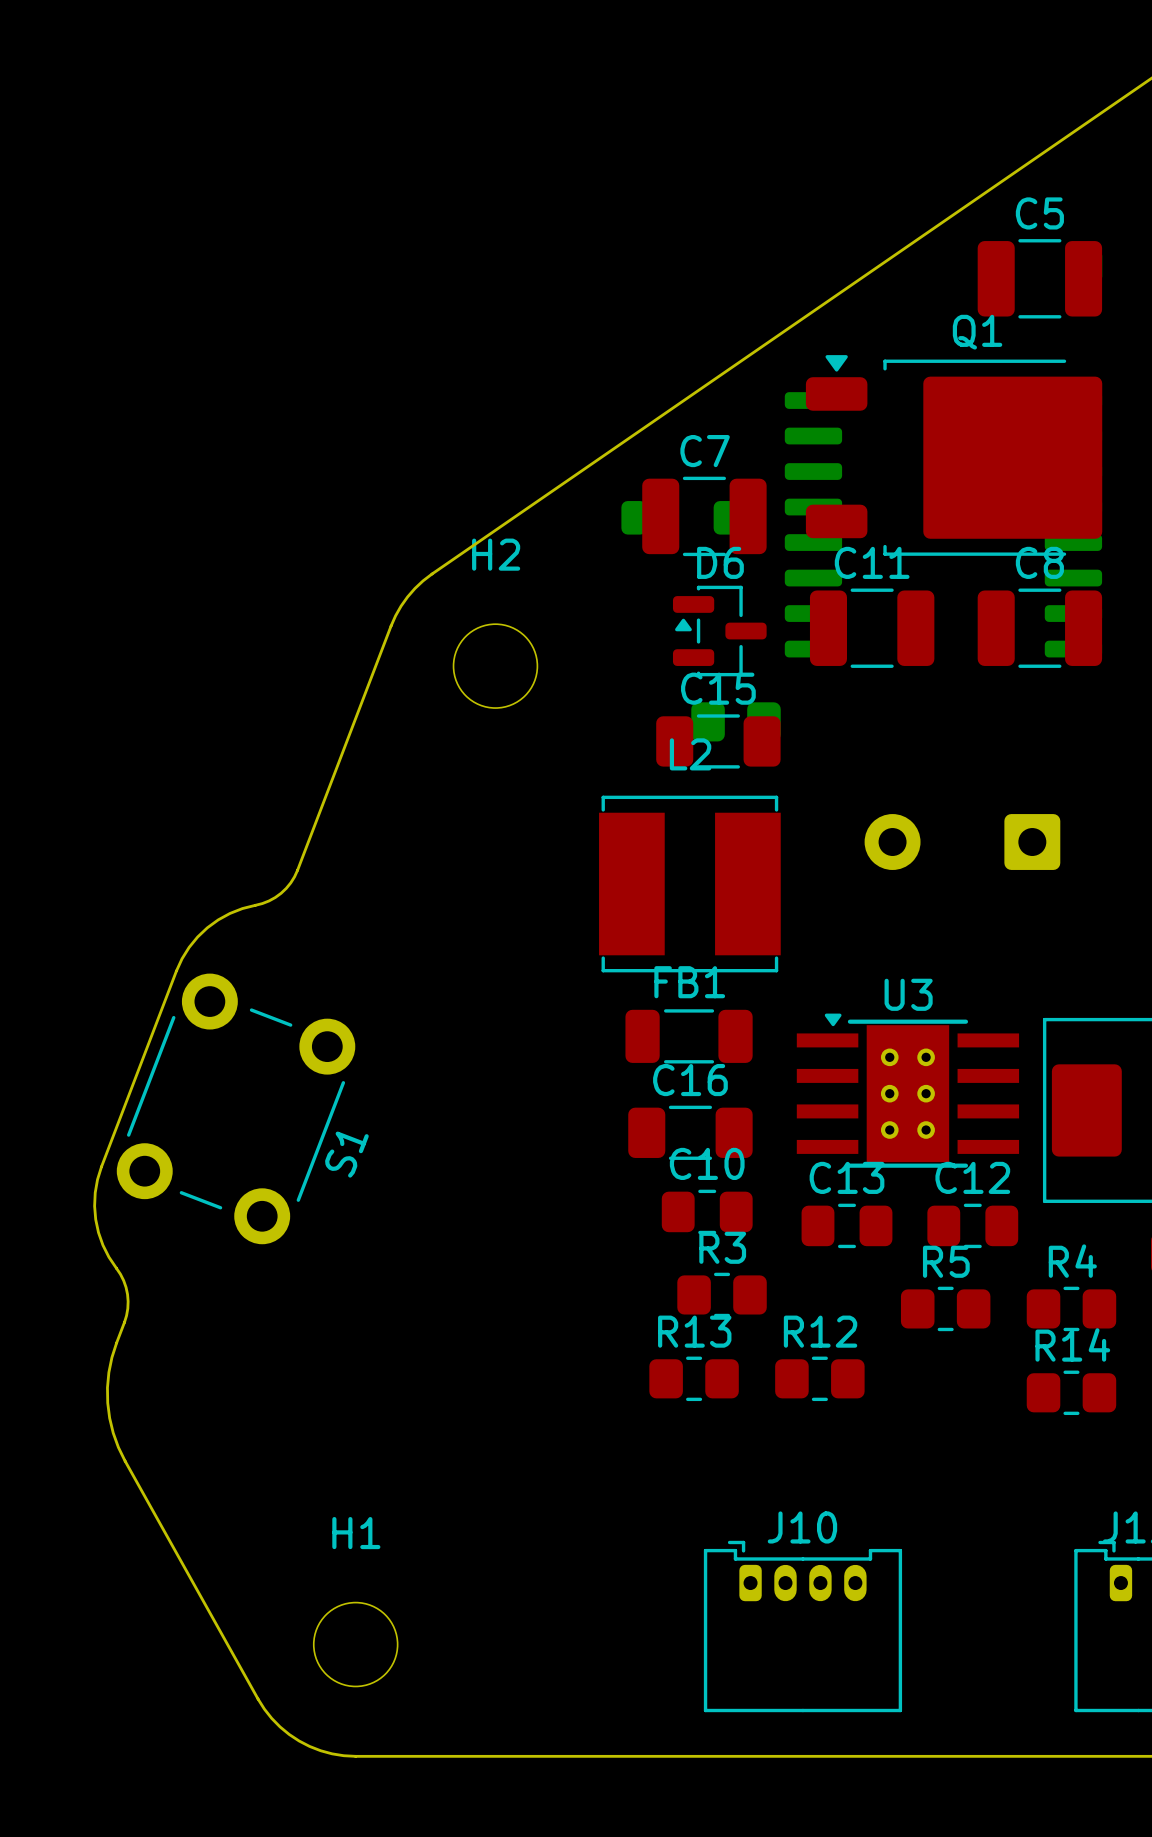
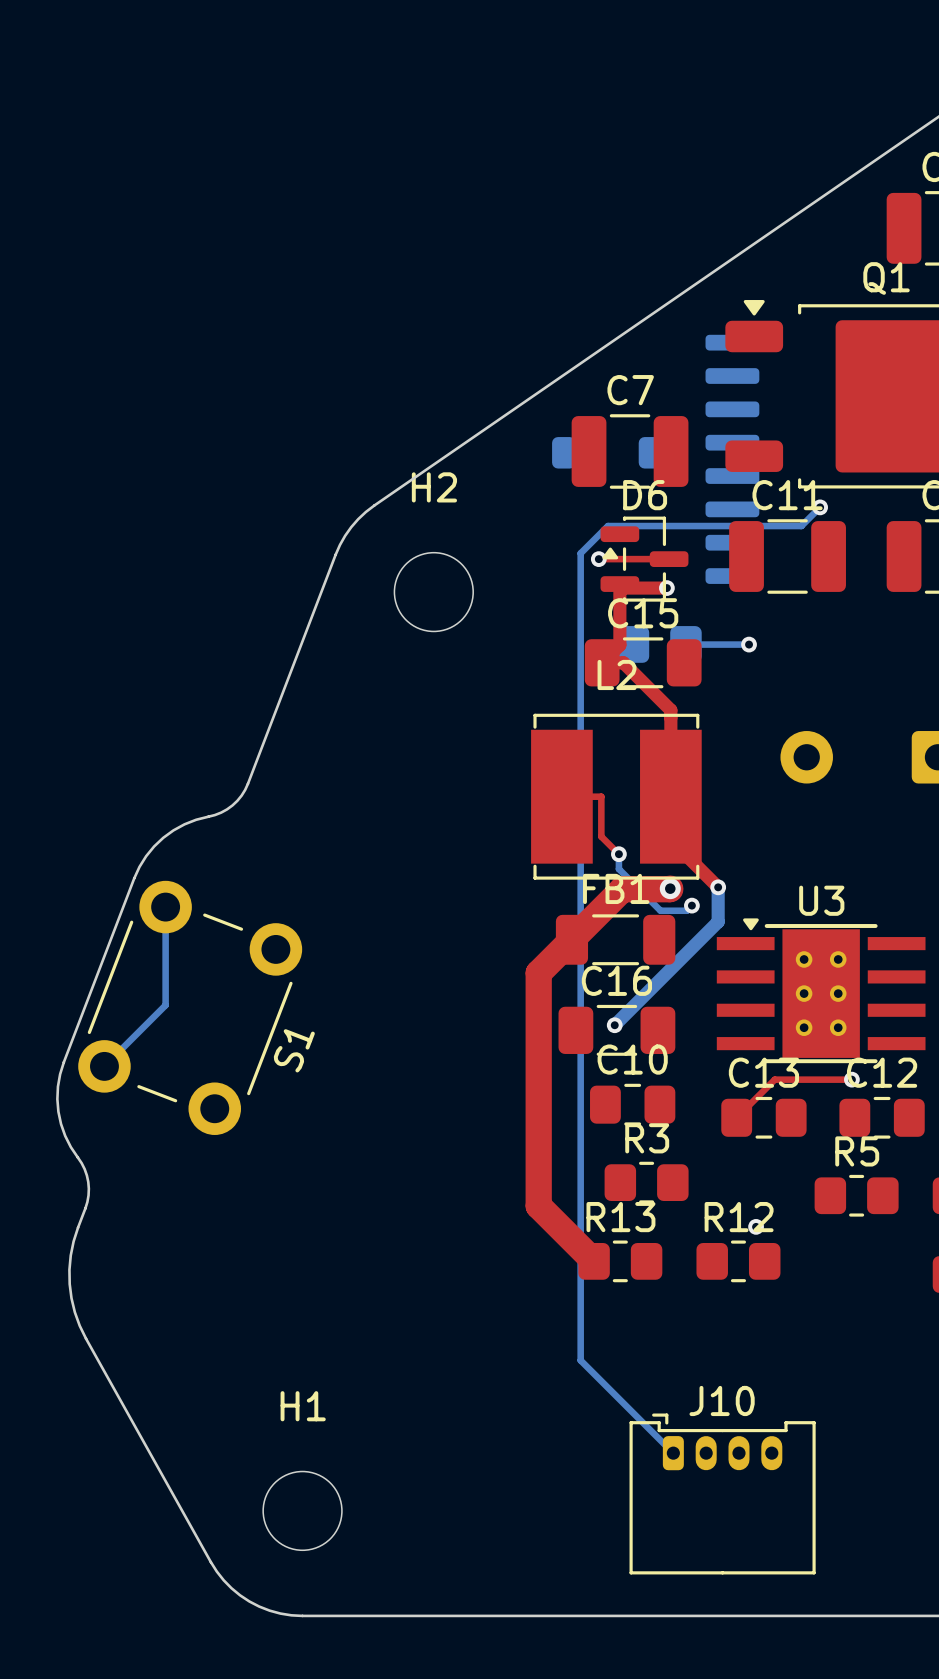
bottom track: none -> (820, 507) (801, 526) (607, 526) (580, 553) (580, 1360) (673, 1453)
via: none -> (820, 507)
top track: none -> (598, 559) (669, 559)
via: none -> (598, 559)
top track: none -> (666, 588) (623, 588) (619, 584) (619, 645) (602, 662) (623, 662) (670, 710) (670, 840) (718, 887)
via: none -> (666, 588)
bottom track: none -> (686, 644) (749, 644)
via: none -> (749, 644)
top track: none -> (561, 796) (601, 796) (601, 836) (618, 854)
bottom track: none -> (618, 854) (618, 869) (660, 910) (686, 910) (691, 905)
via: none -> (618, 854)
bottom track: none -> (718, 887) (718, 921) (614, 1025)
via: none -> (718, 887)
top track: none -> (670, 888) (622, 889) (538, 973) (538, 1205) (594, 1261)
via: none -> (670, 888)
via: none -> (691, 905)
bottom track: none -> (165, 907) (165, 1005) (104, 1066)
via: none -> (614, 1025)
top track: none -> (851, 1079) (774, 1079) (736, 1117)
via: none -> (851, 1079)
via: none -> (756, 1226)

